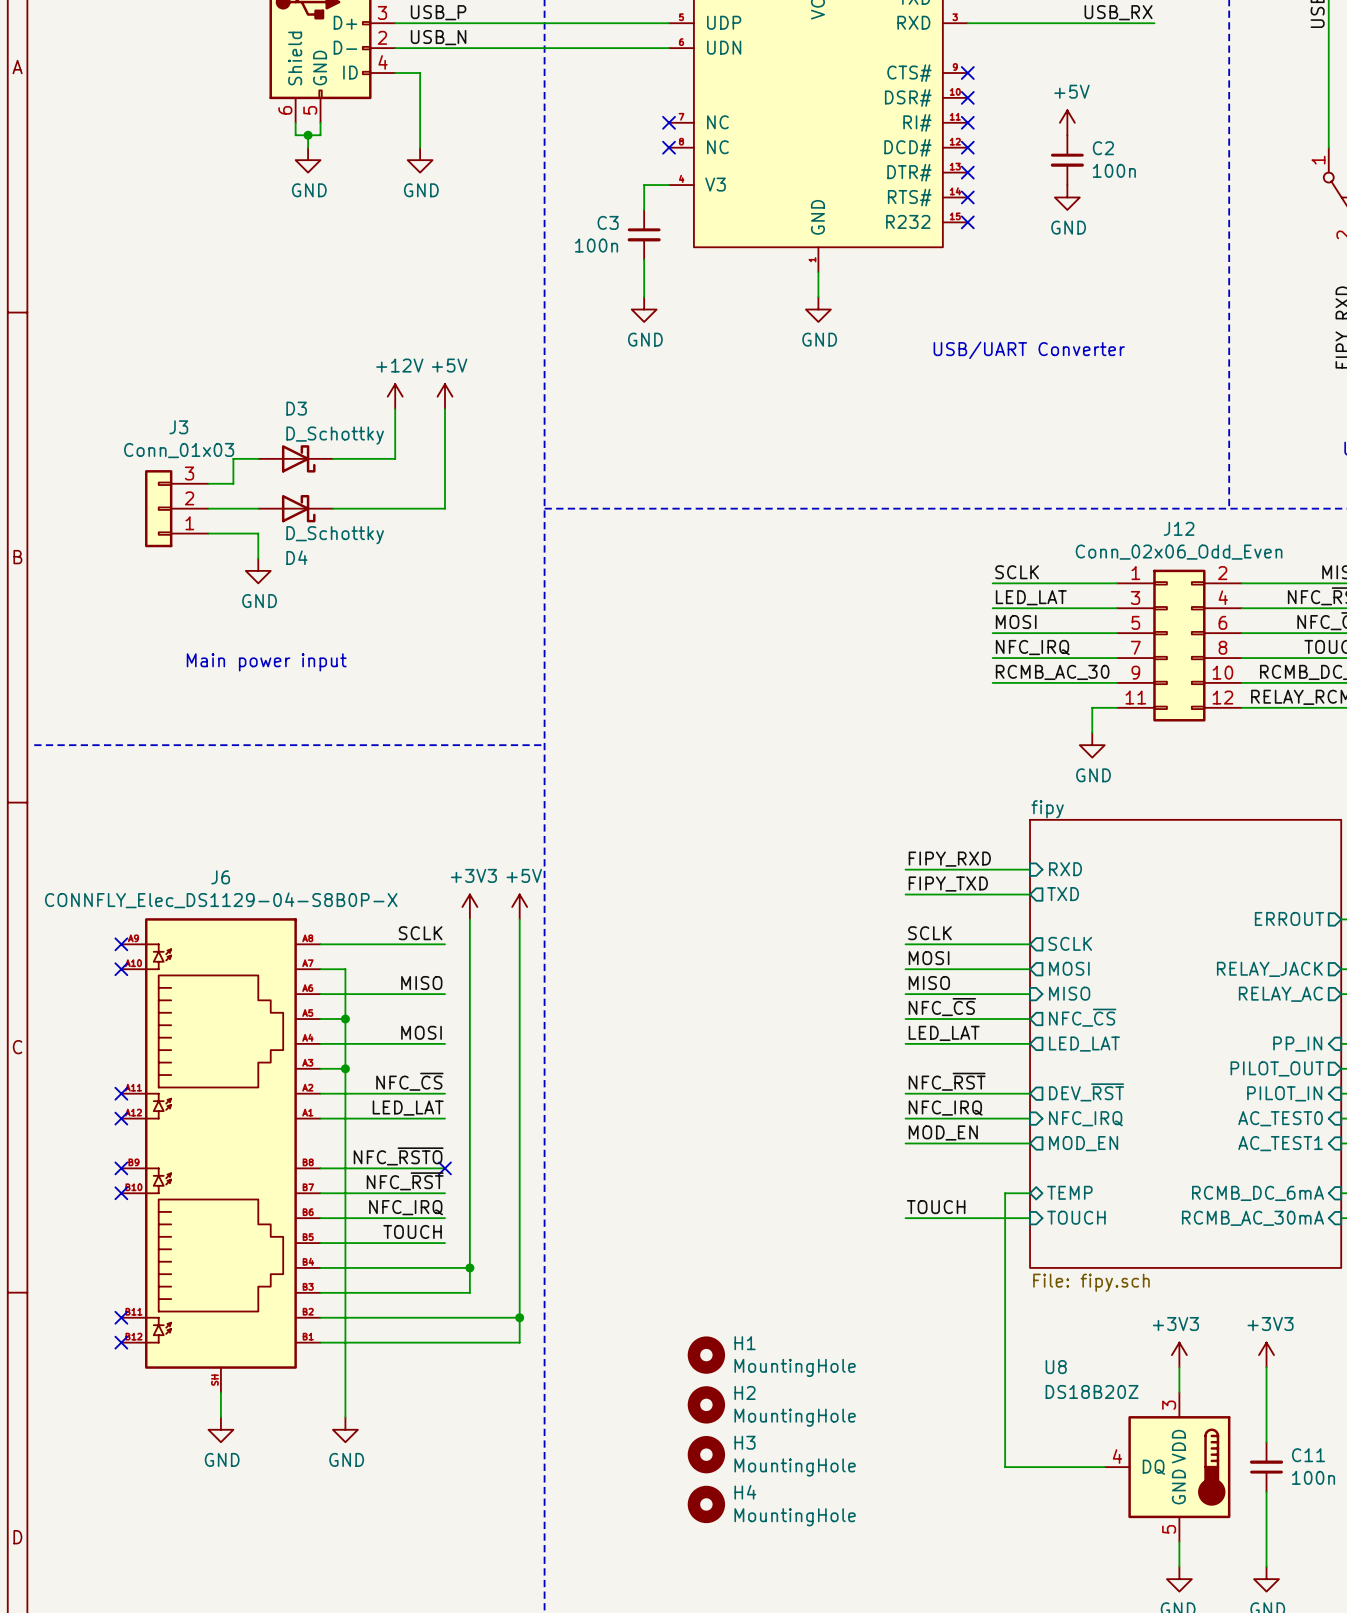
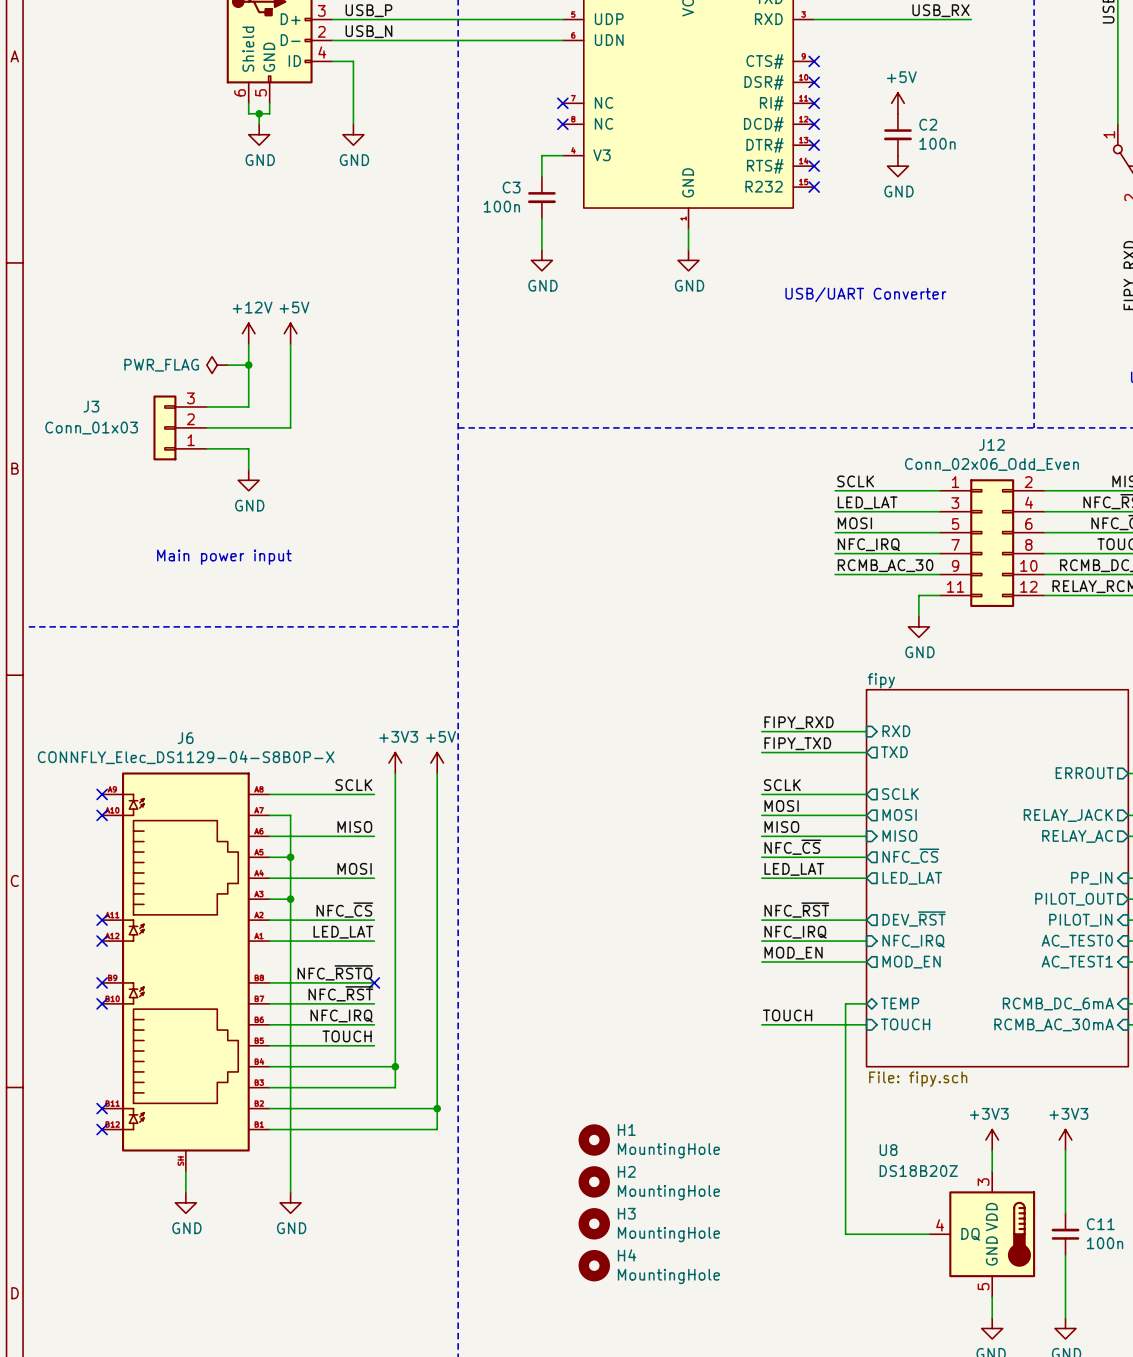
power symbol position: +12V (395, 396) -> +12V (248, 333)
power symbol position: +5V (444, 396) -> +5V (290, 333)
wire: none -> (248, 344) (248, 406) (206, 406)
wire: (395, 409) (395, 458) (332, 458) -> none
wire: (444, 409) (444, 508) (345, 508) -> (290, 344) (290, 427)
J3 name position: J3 (178, 427) -> J3 (91, 406)
power symbol: none -> PWR_FLAG (217, 365)
wire: none -> (227, 365) (248, 365)
junction: none -> (248, 365)
J3 value position: Conn_01x03 (179, 450) -> Conn_01x03 (91, 428)
wire: (258, 458) (233, 458) (233, 483) (208, 483) -> none
D3: D_Schottky (295, 458) -> none
J3 position: (176, 508) -> (180, 427)
D4: D_Schottky (295, 508) -> none
wire: (258, 533) (258, 558) -> (217, 448) (248, 448) (248, 469)
power symbol position: GND (258, 570) -> GND (248, 480)

